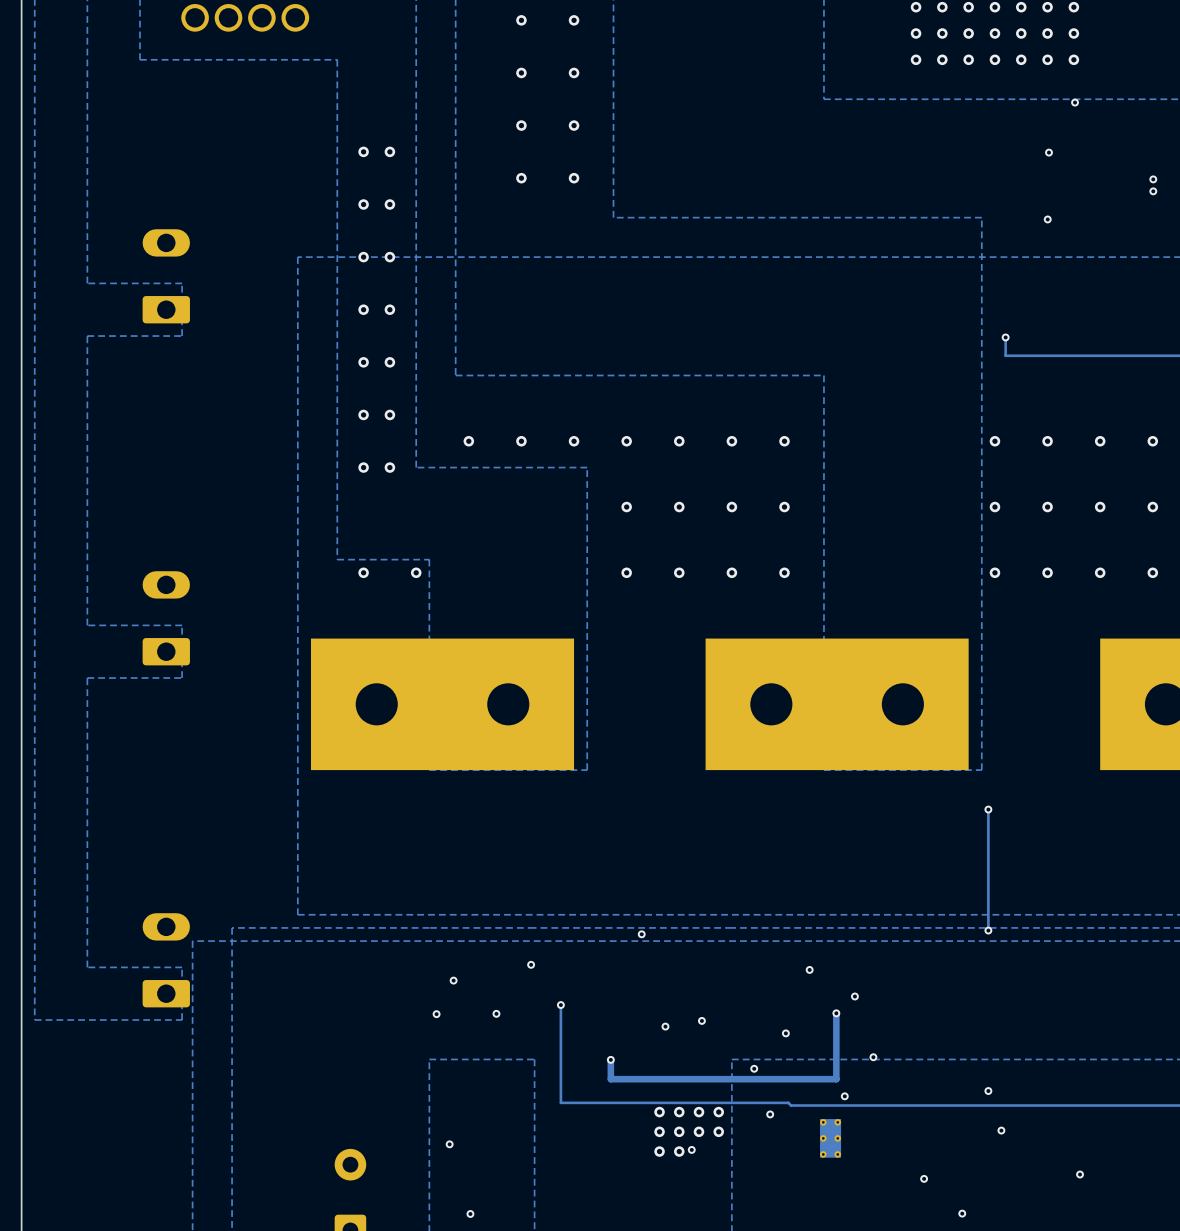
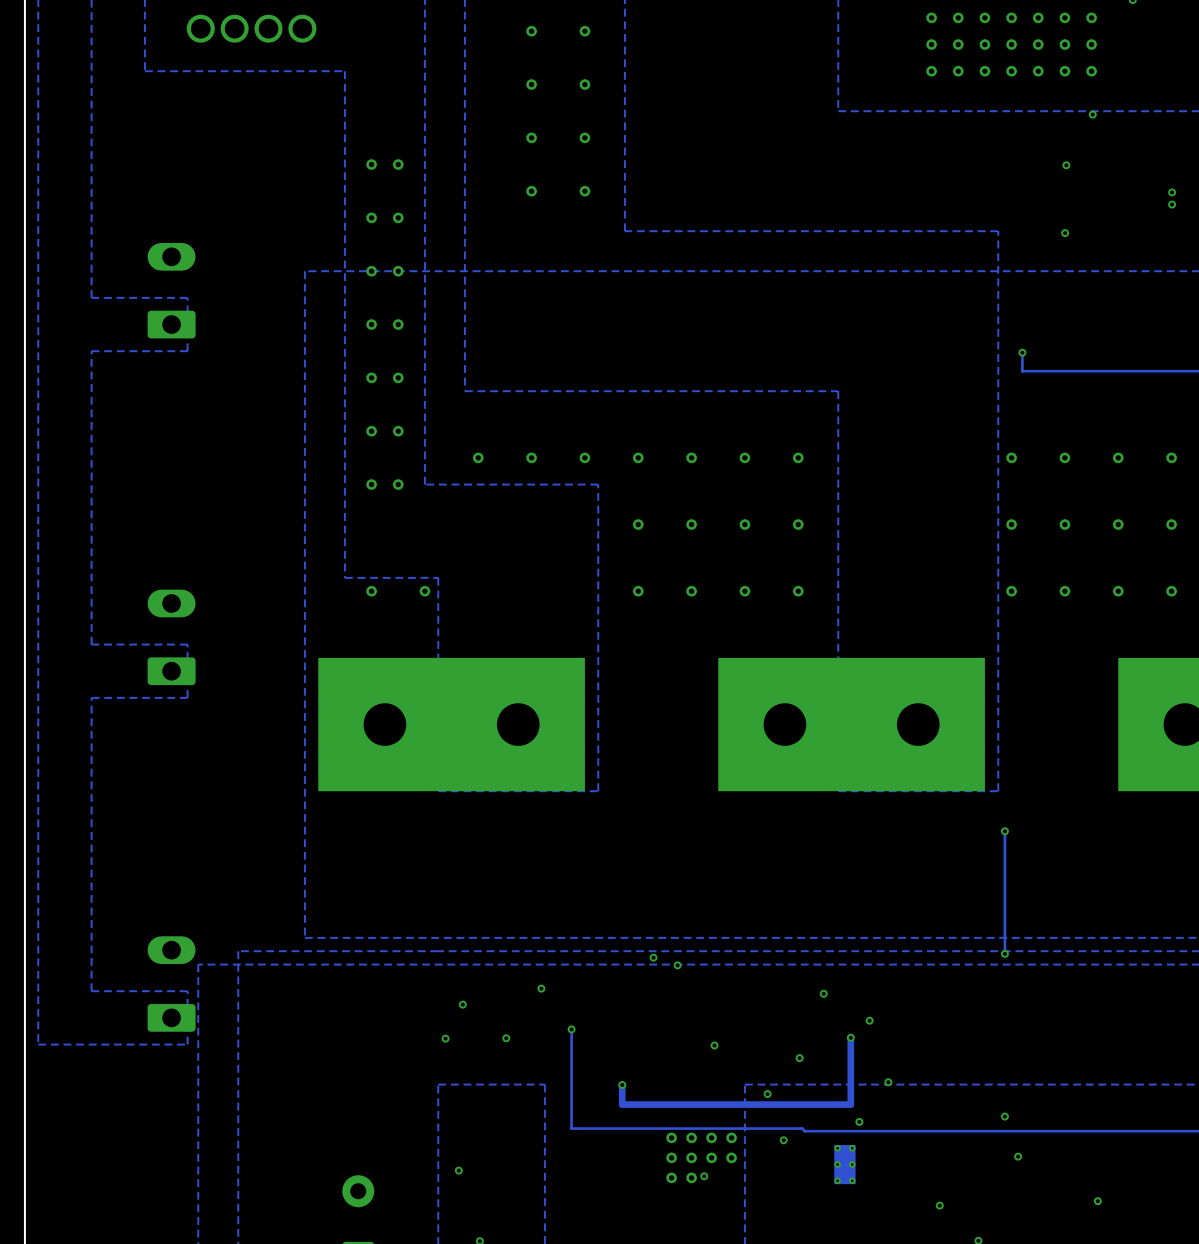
via: none -> (677, 965)
via: (665, 1026) -> none

